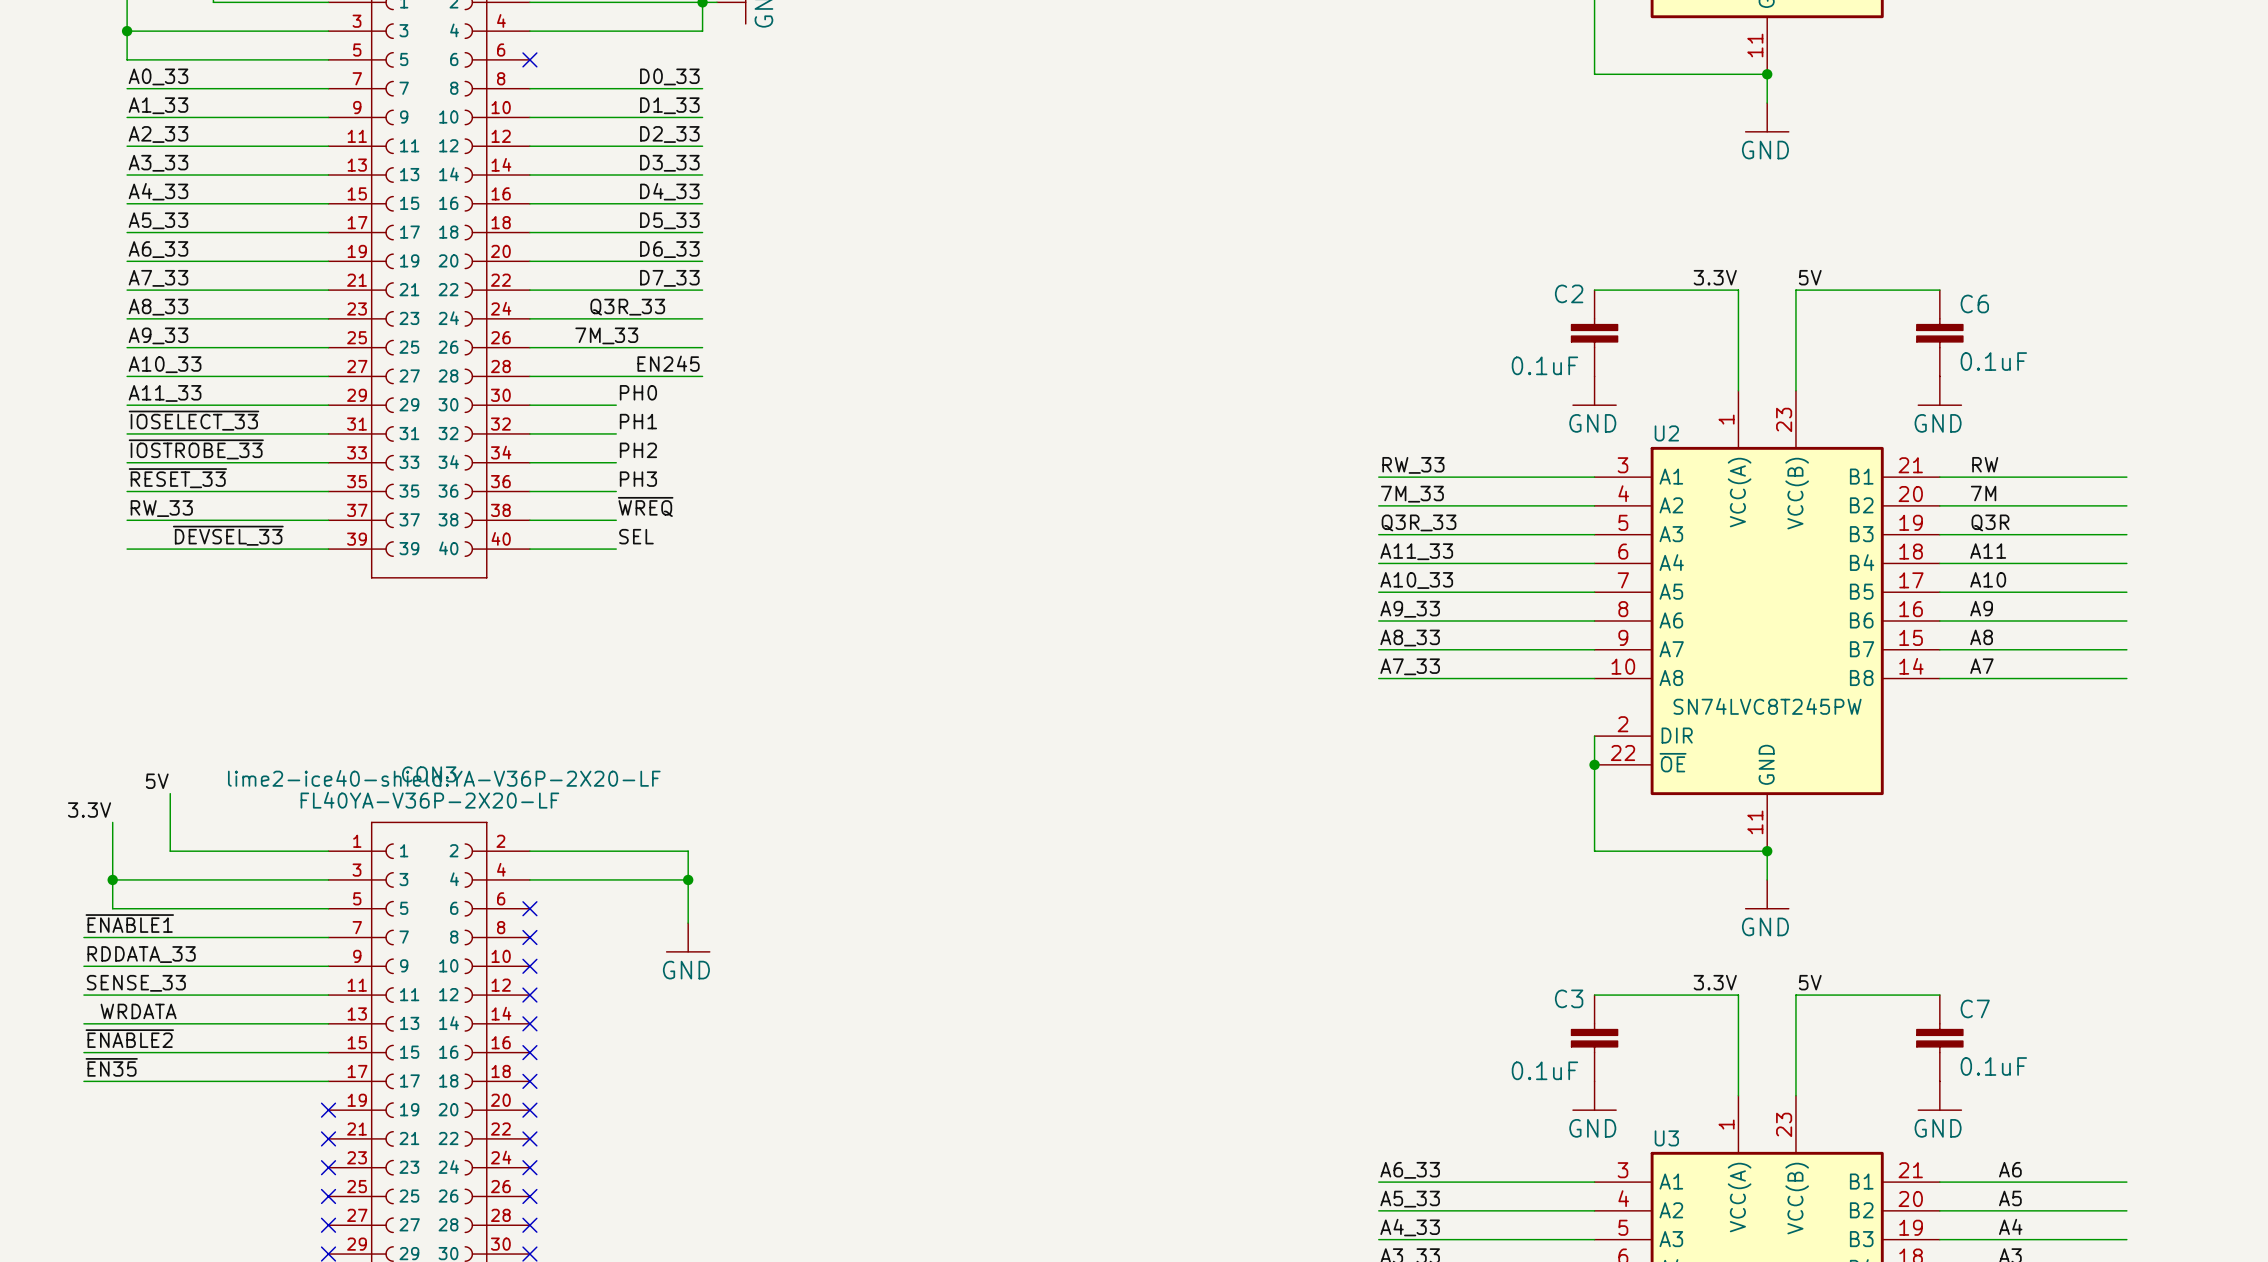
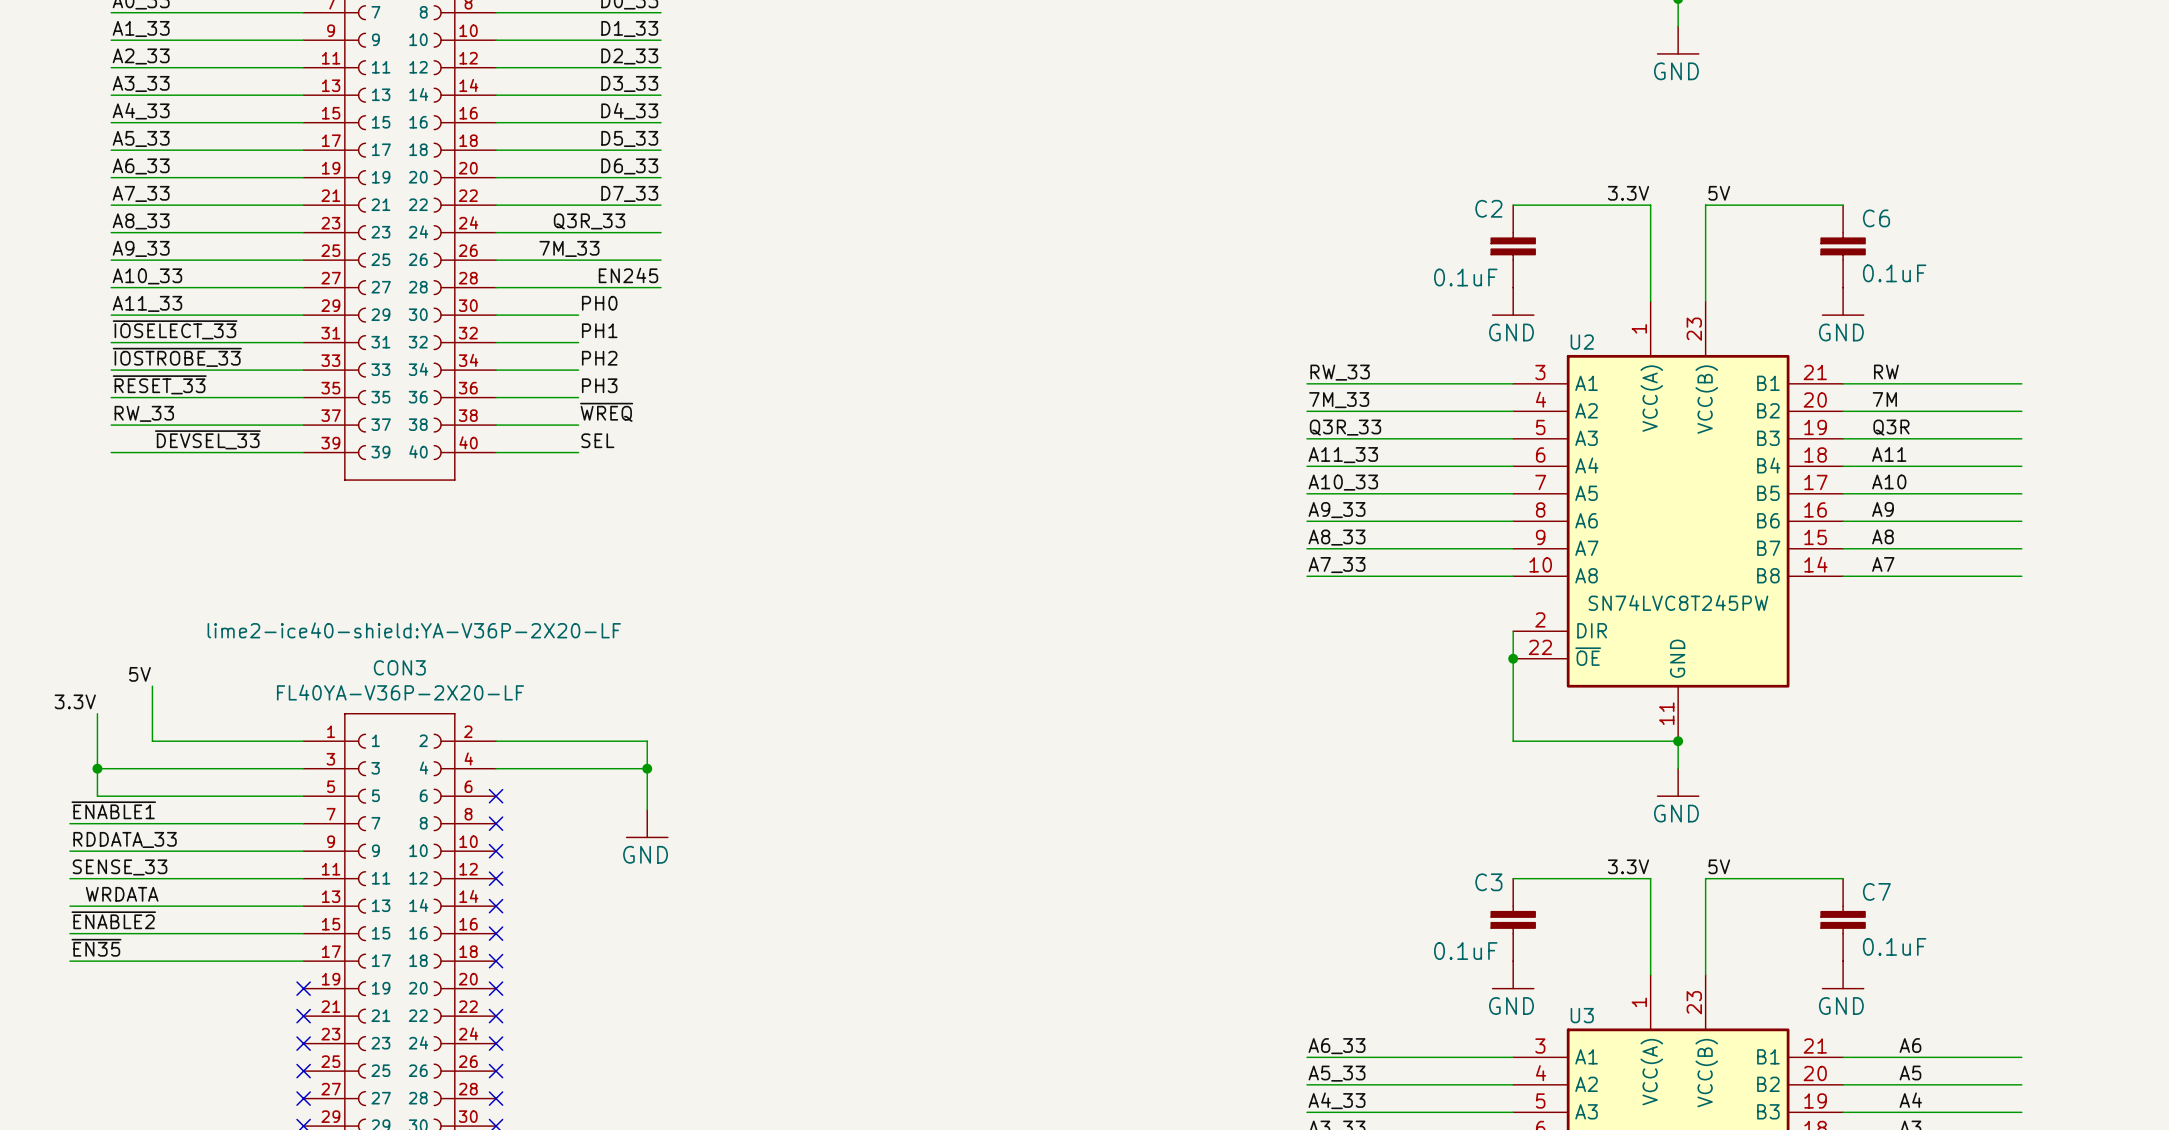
CON3 text position: lime2-ice40-shield:YA-V36P-2X20-LF (444, 778) -> lime2-ice40-shield:YA-V36P-2X20-LF (414, 630)

